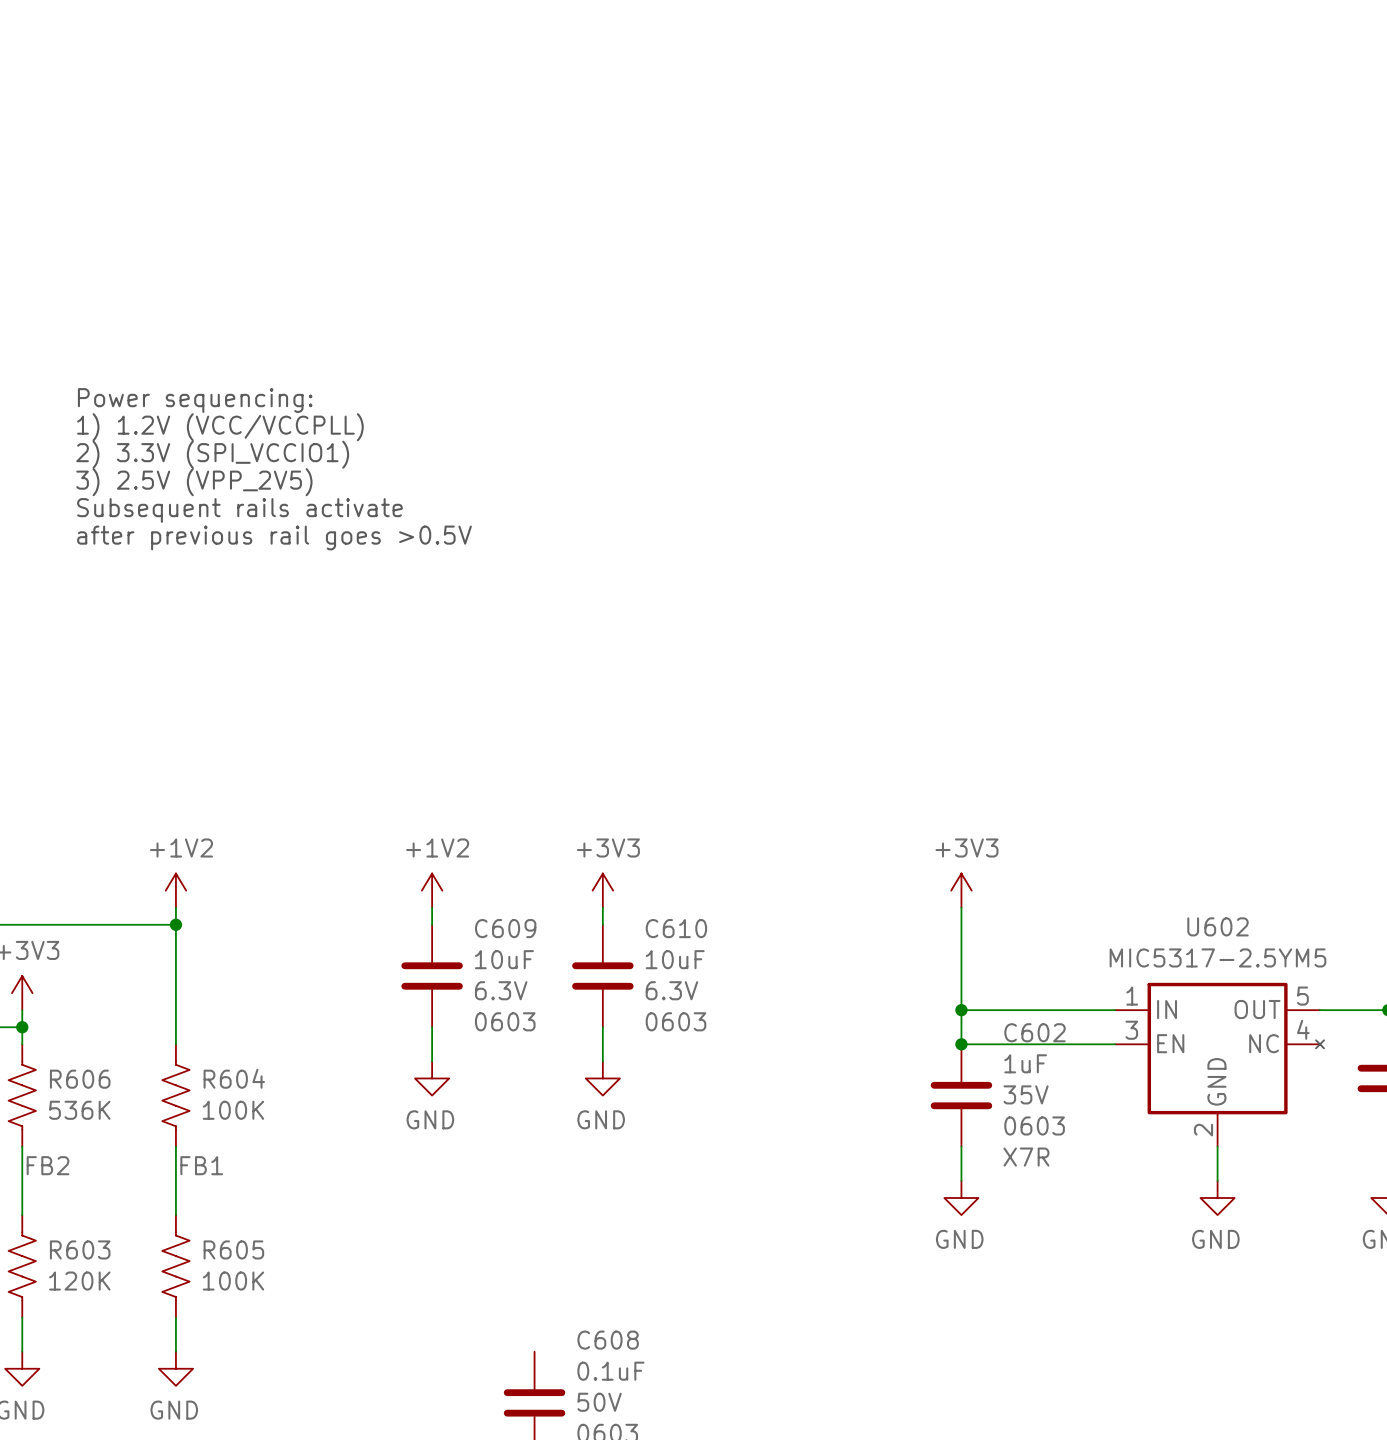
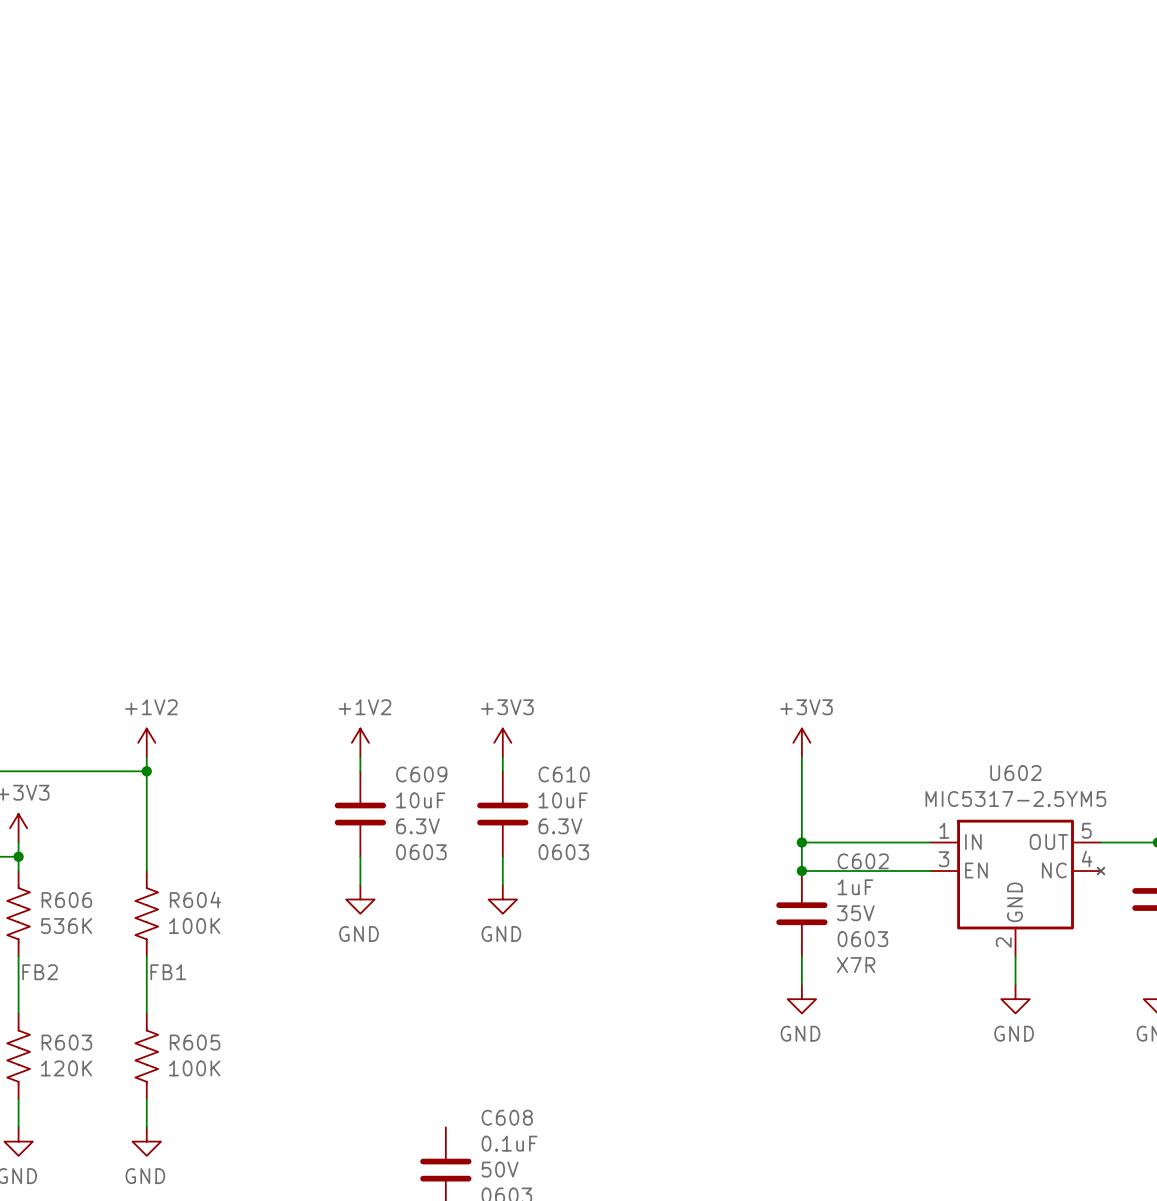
text: Power sequencing: (195, 400) -> none
text: 1) 1.2V (VCC/VCCPLL) (220, 427) -> none
text: 2) 3.3V (SPI_VCCIO1) (212, 454) -> none
text: 3) 2.5V (VPP_2V5) (194, 482) -> none
text: Subsequent rails activate (239, 510) -> none
text: after previous rail goes >0.5V (274, 537) -> none

